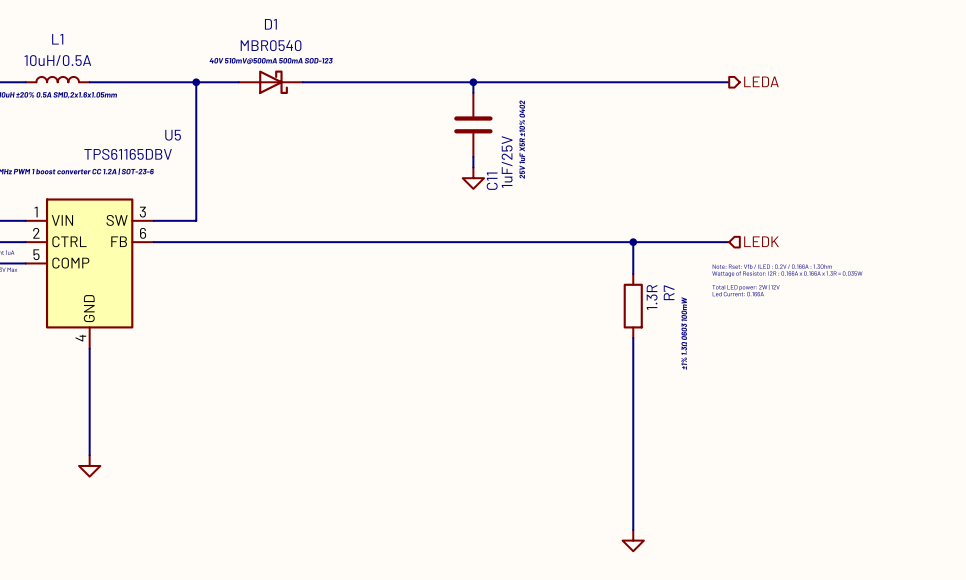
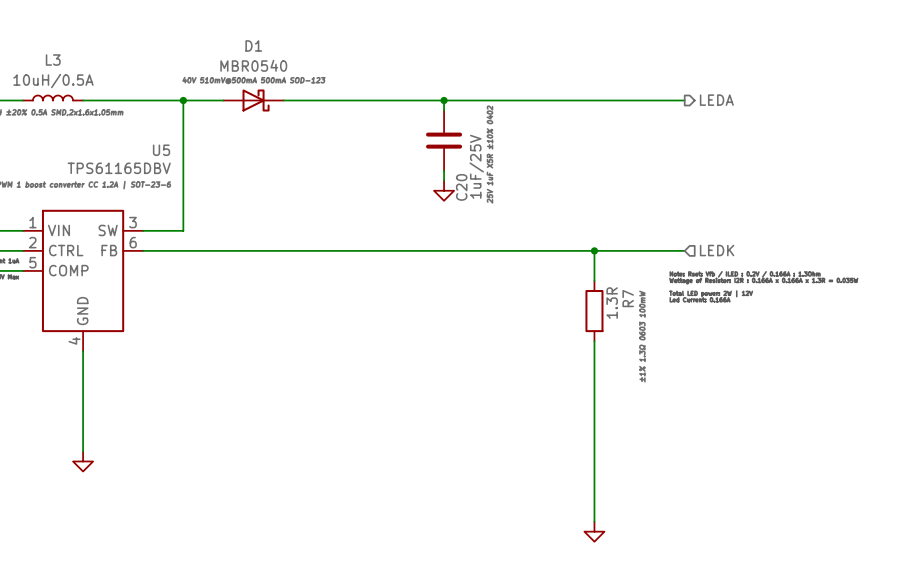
L1 name: L1 (57, 39) -> L3 (53, 60)
C11 name: C11 (492, 181) -> C20 (461, 187)

